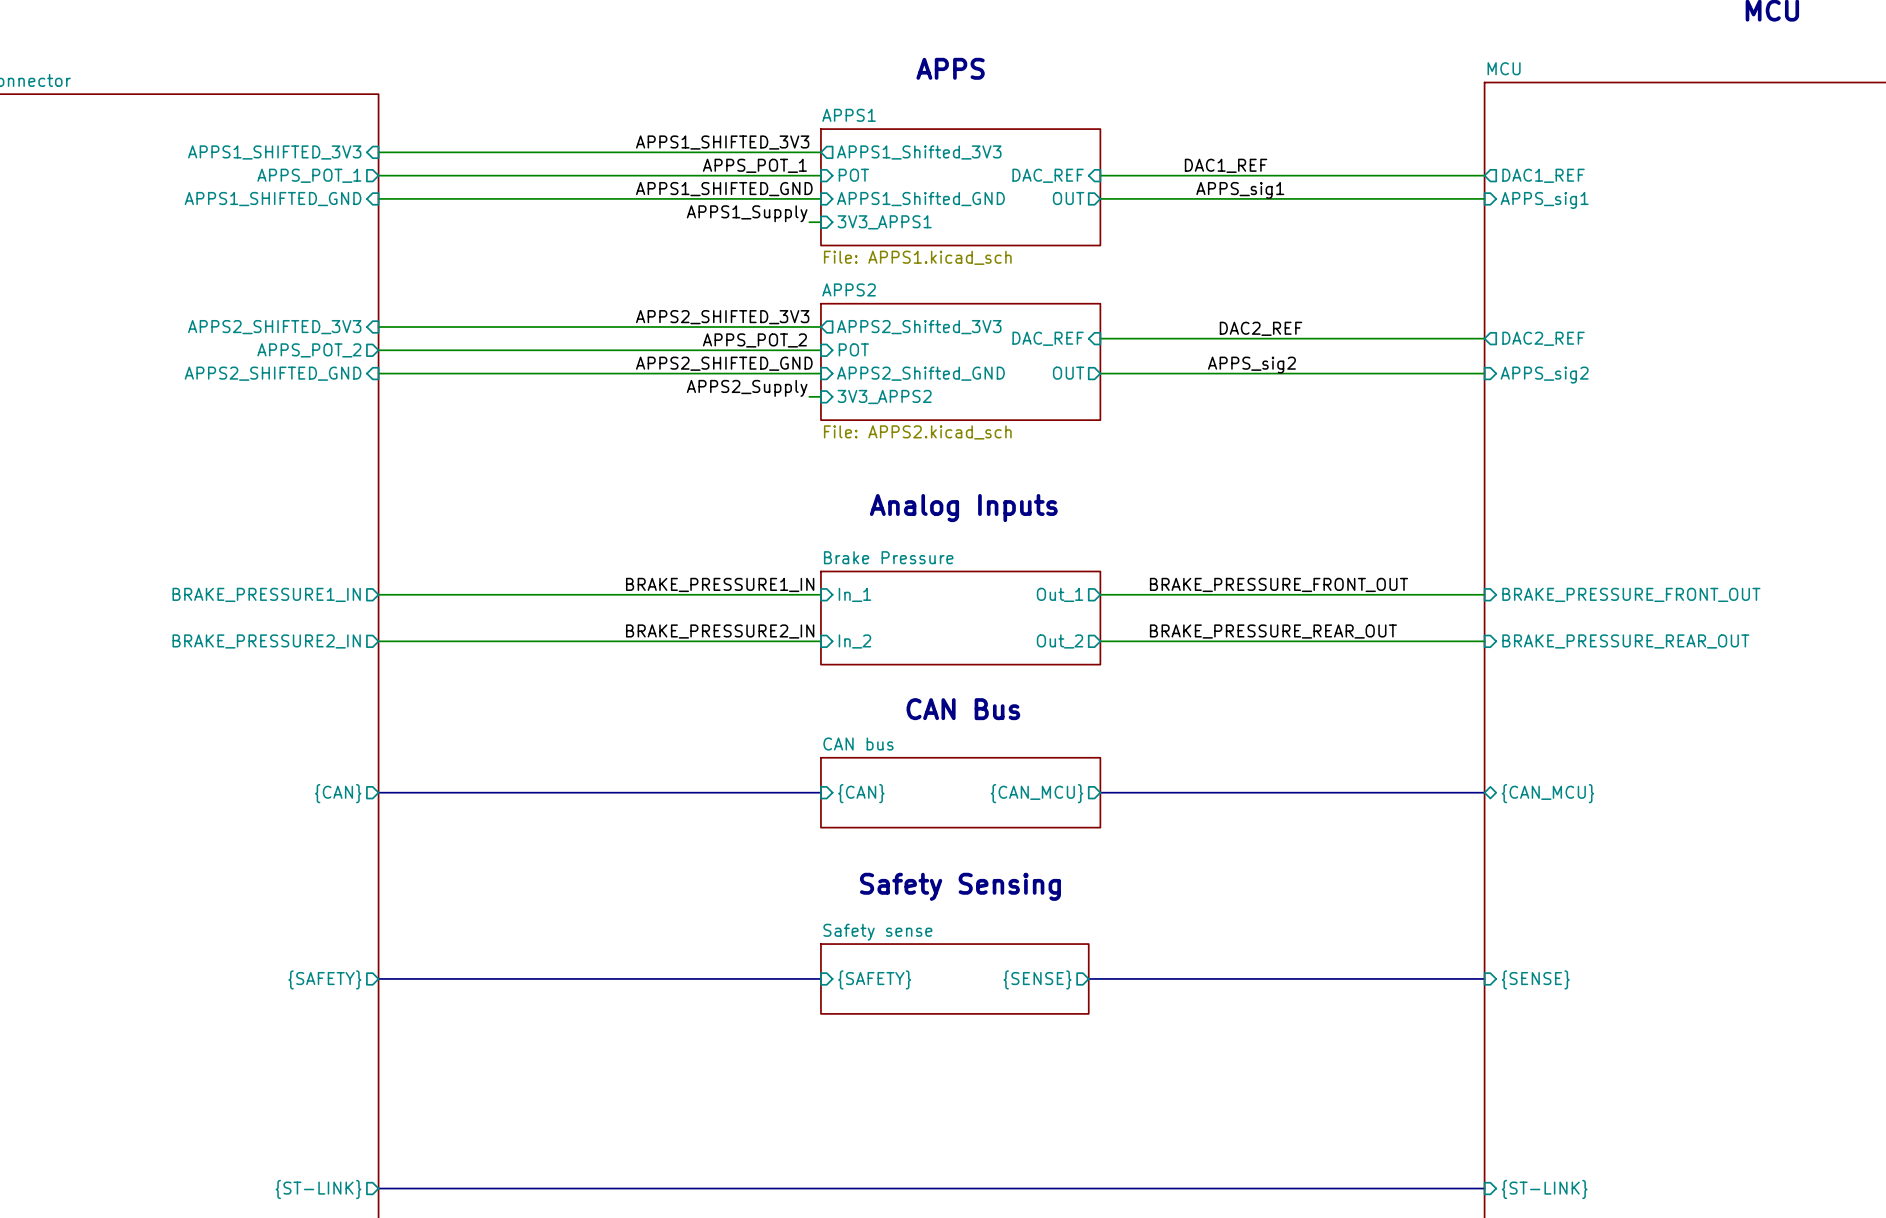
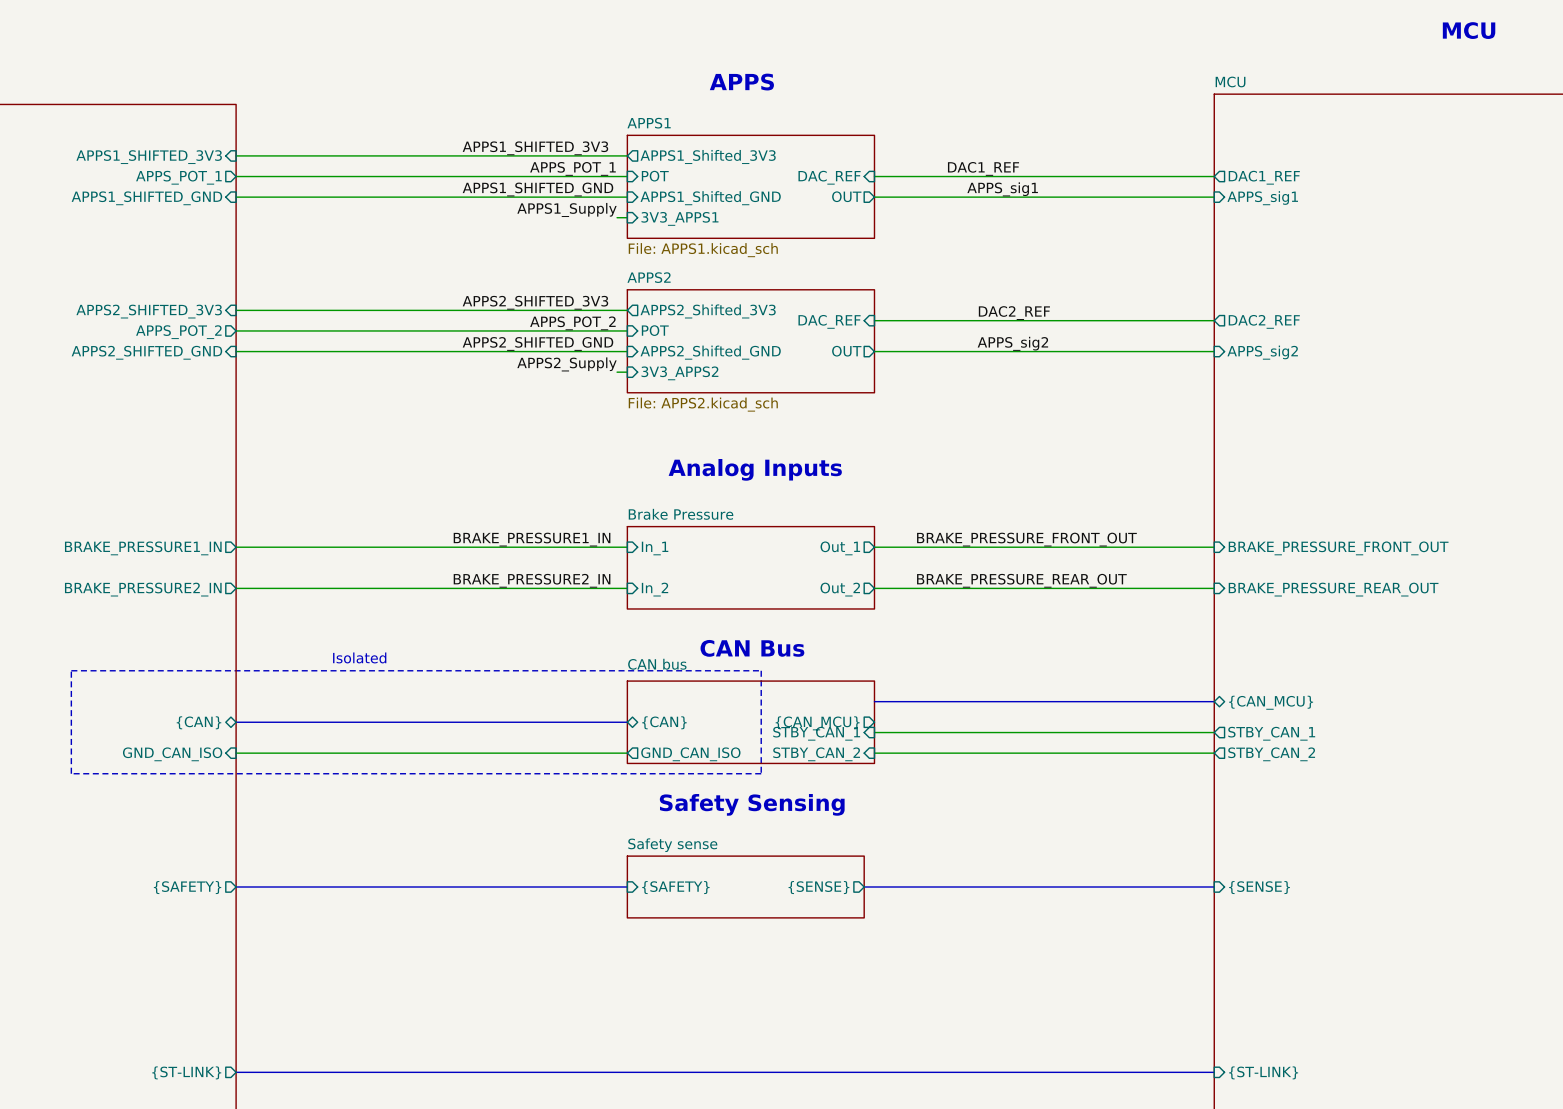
text: none -> Isolated (359, 657)
line: none -> (71, 670) (761, 670) (761, 773) (71, 773) (71, 670)
sheet CAN bus shape: [820, 757, 1102, 829] -> [626, 680, 876, 765]
bus: (1100, 792) (1484, 792) -> (874, 701) (1214, 701)
sheet pin shape: output (338, 793) -> bidirectional (198, 722)
sheet pin shape: input (861, 793) -> bidirectional (664, 722)
sheet pin position: {CAN_MCU} (1547, 793) -> {CAN_MCU} (1271, 702)
sheet pin: none -> STBY_CAN_1 (816, 733)
wire: none -> (874, 732) (1214, 732)
sheet pin: none -> STBY_CAN_1 (1271, 733)
sheet pin: none -> GND_CAN_ISO (172, 754)
wire: none -> (236, 753) (627, 753)
sheet pin: none -> GND_CAN_ISO (690, 754)
sheet pin: none -> STBY_CAN_2 (816, 754)
wire: none -> (874, 753) (1214, 753)
sheet pin: none -> STBY_CAN_2 (1271, 754)

